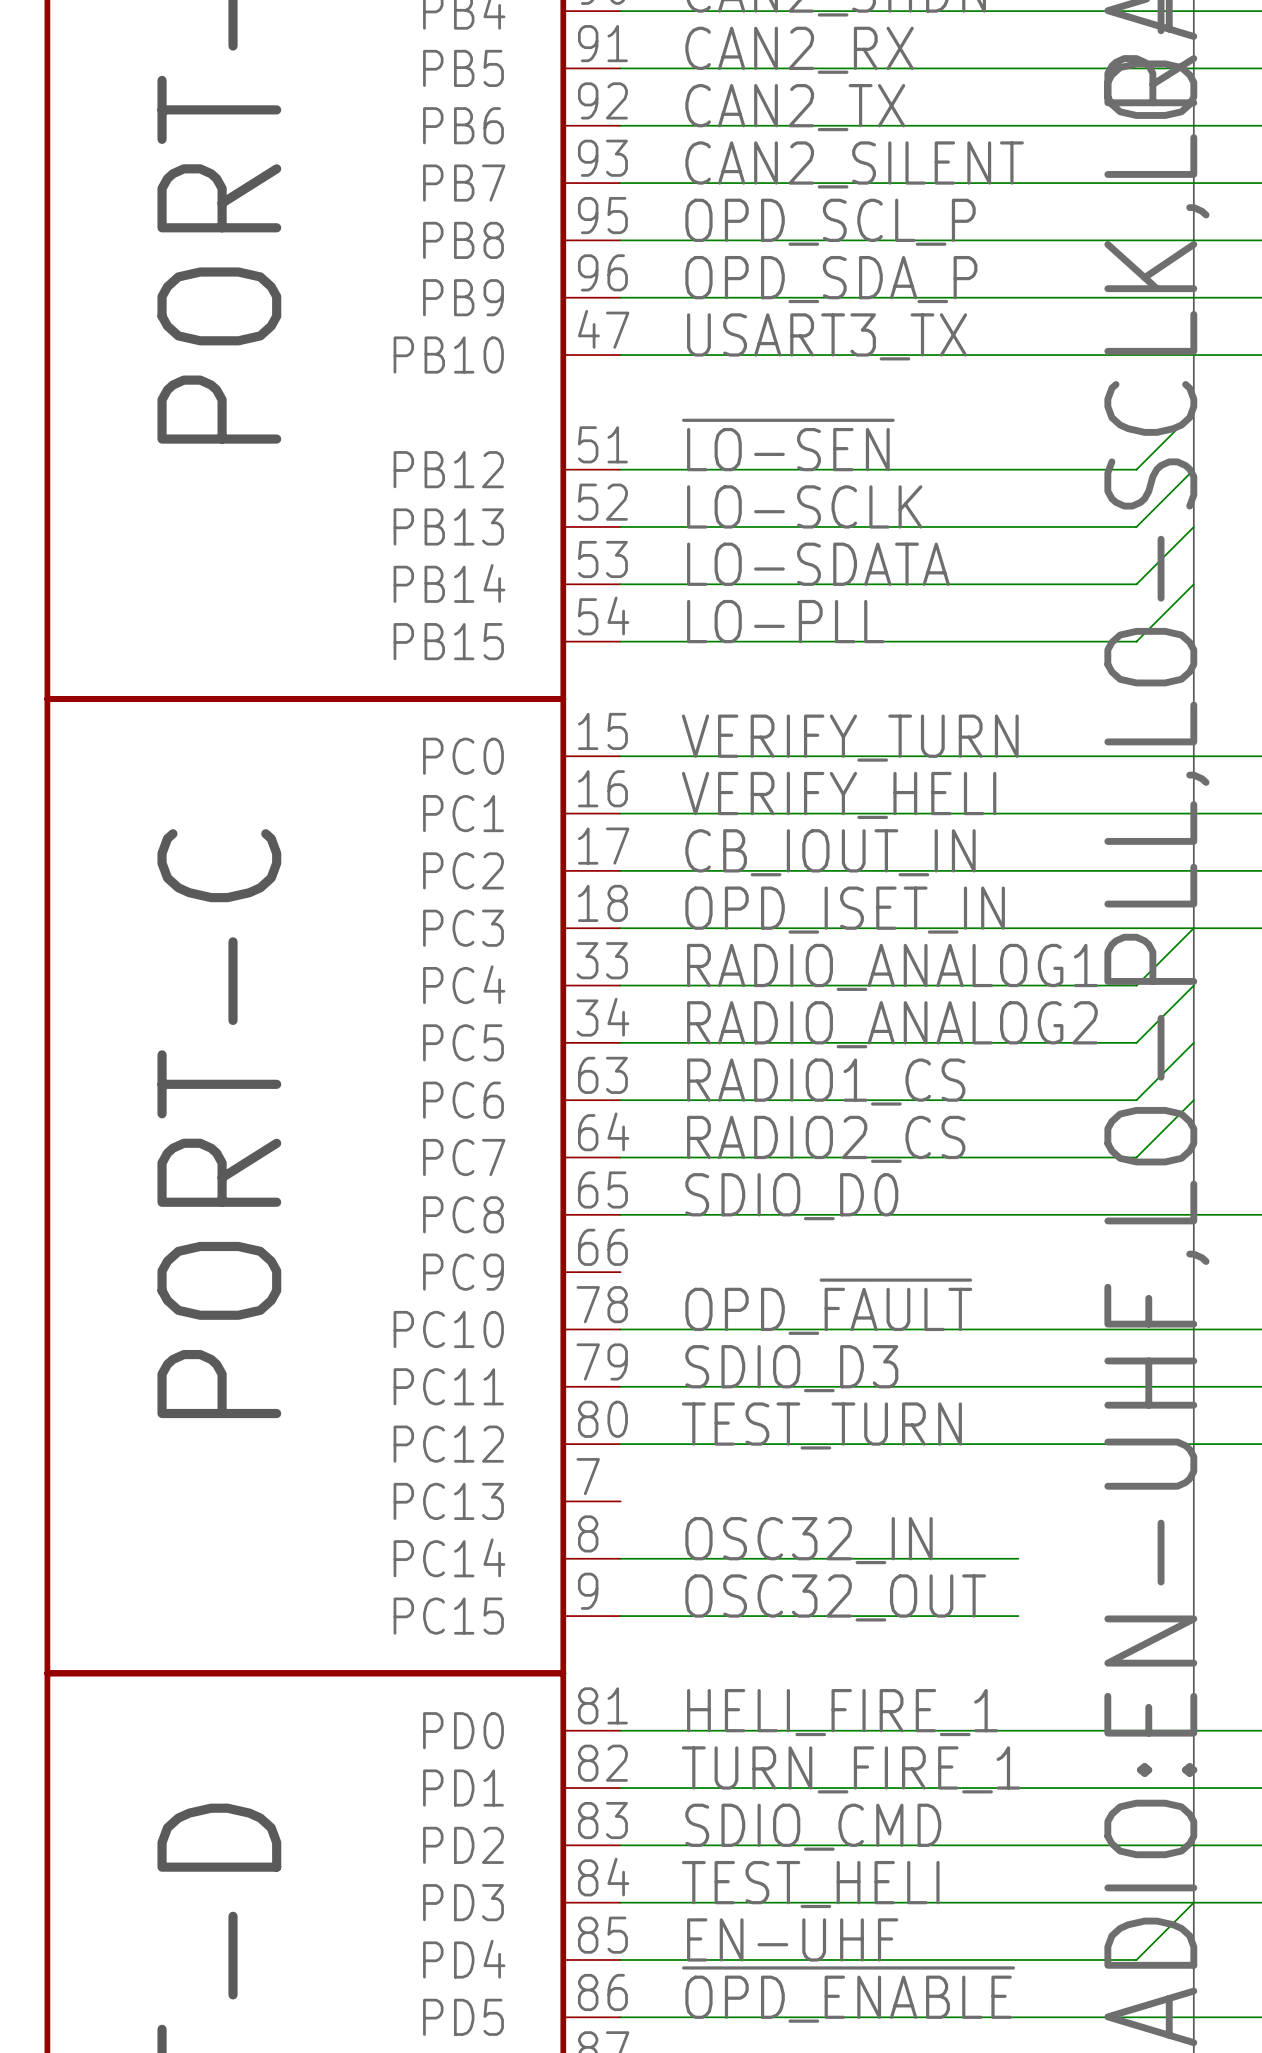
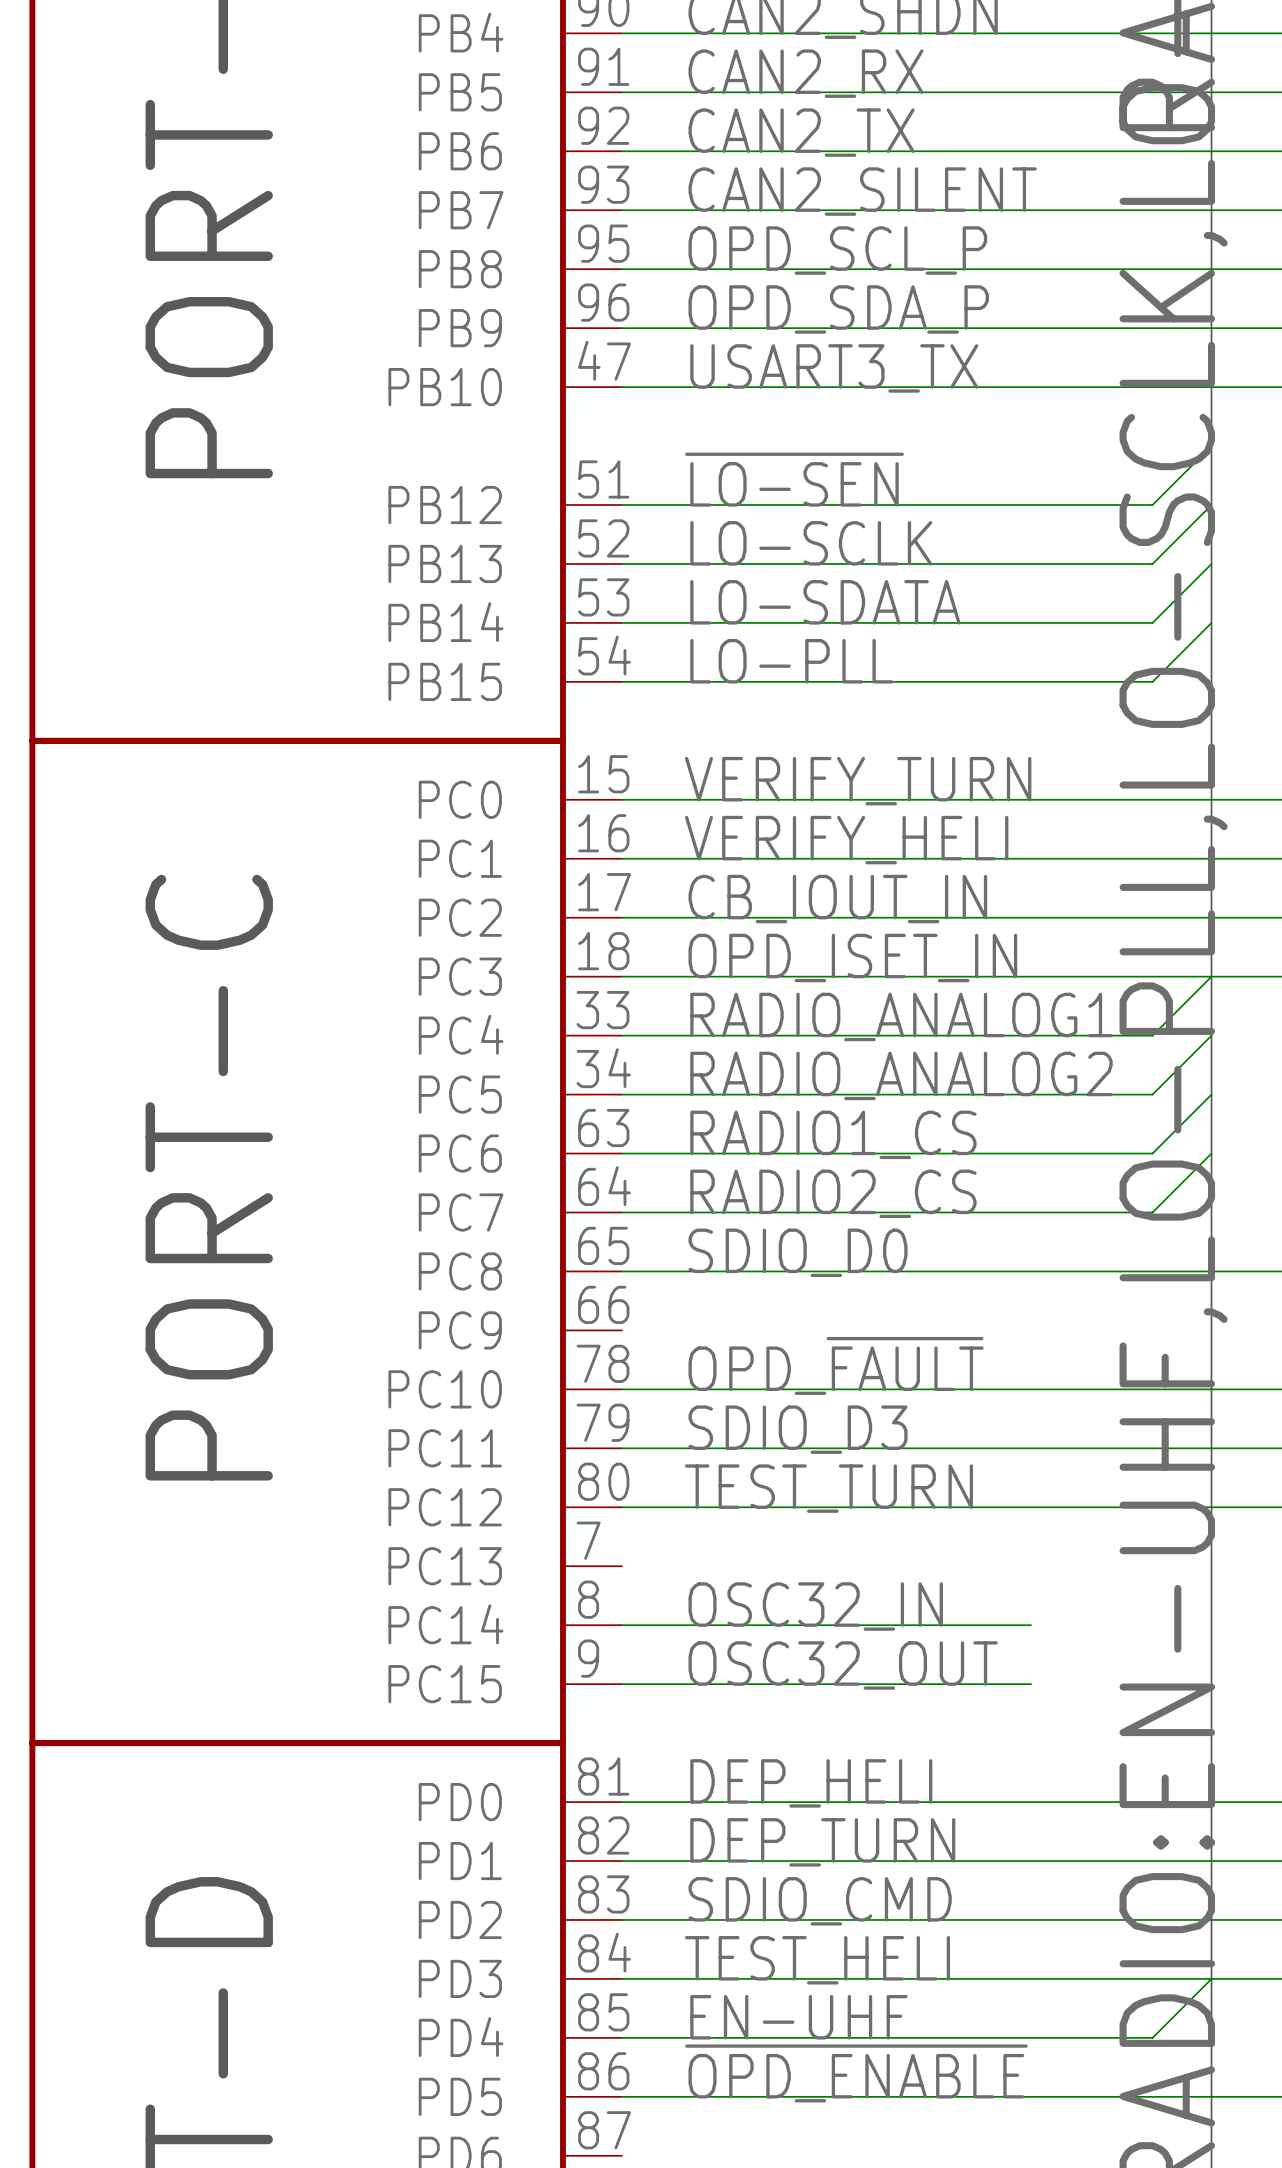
label: HELI_FIRE_1 (842, 1712) -> DEP_HELI (811, 1783)
label: TURN_FIRE_1 (851, 1769) -> DEP_TURN (822, 1842)

